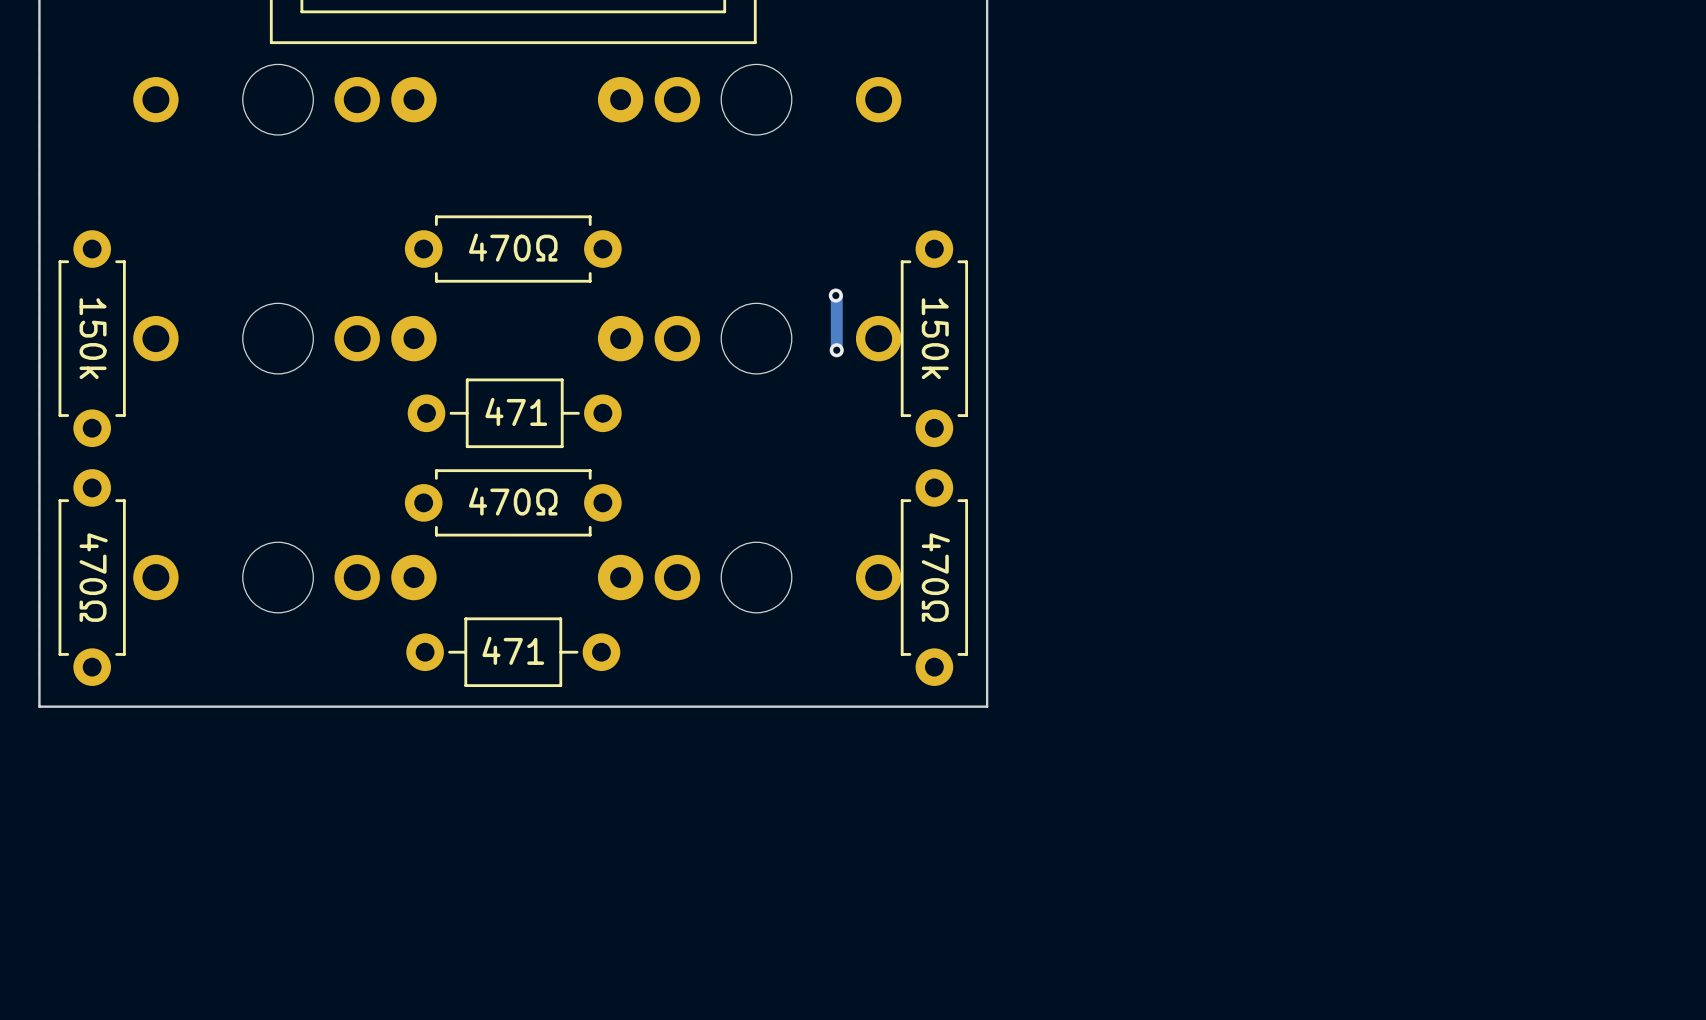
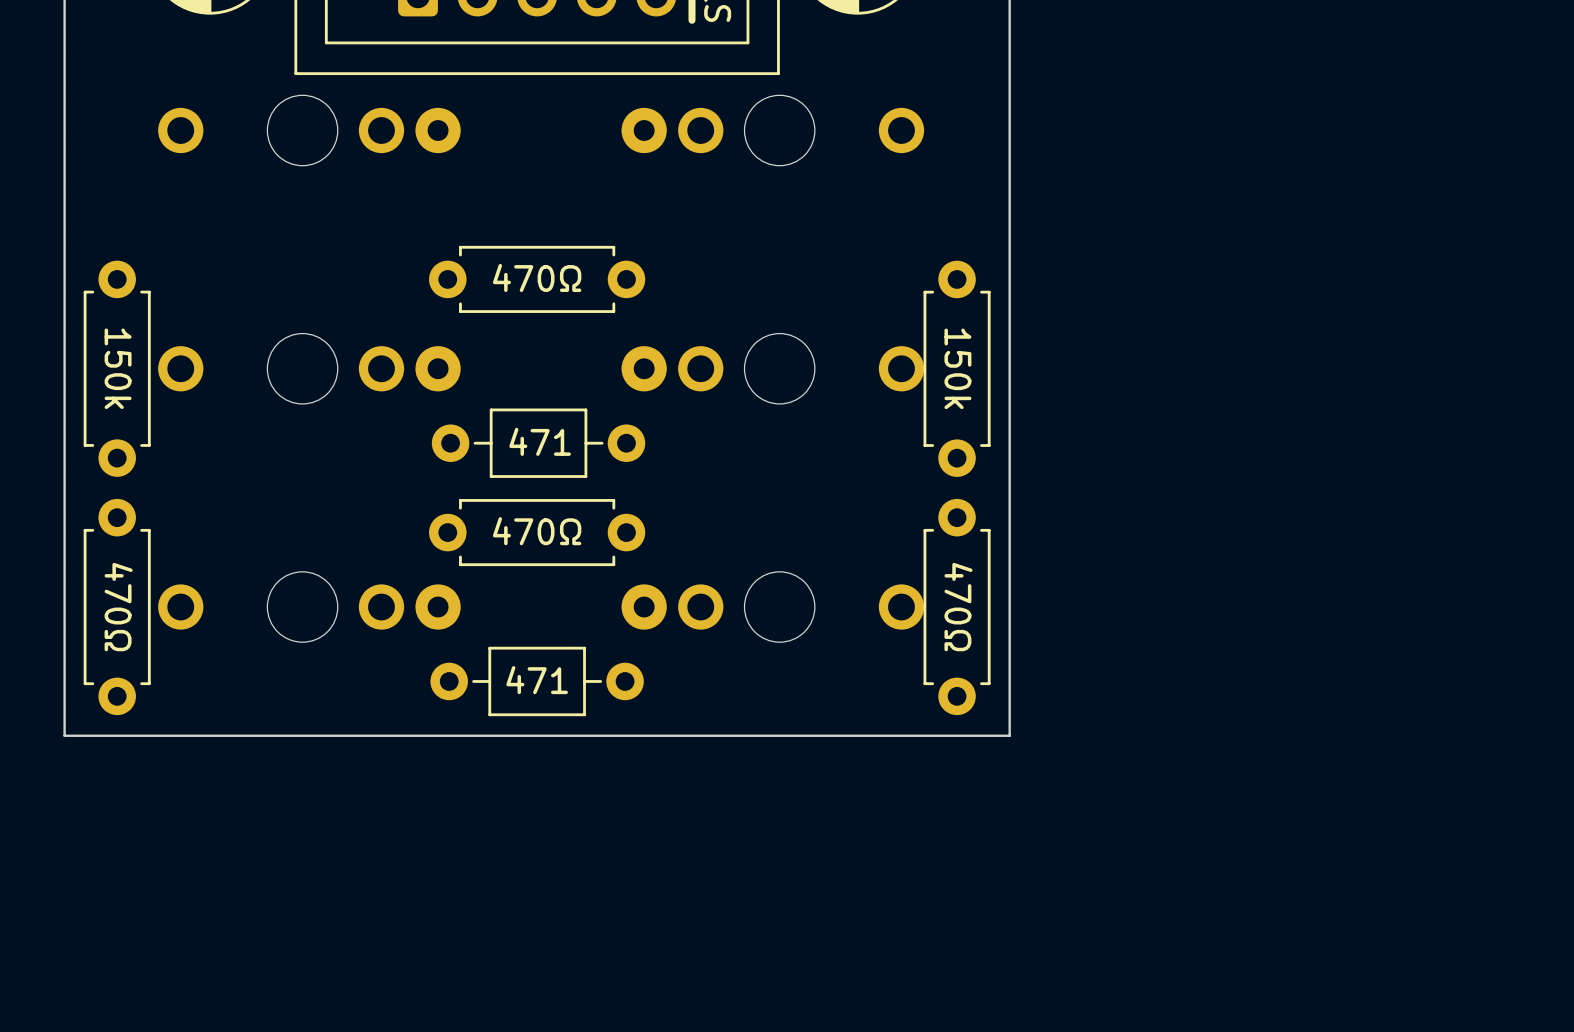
track: (835, 295) (836, 350) -> none
via: (835, 295) -> none
via: (836, 350) -> none

